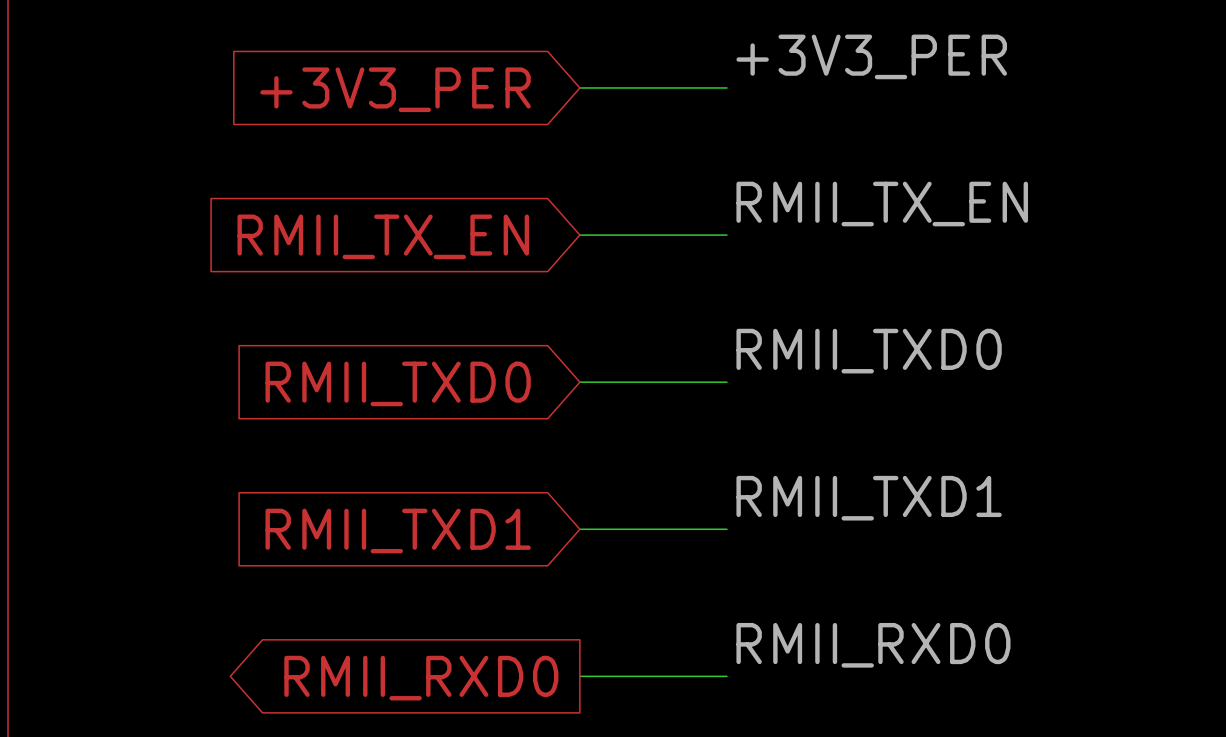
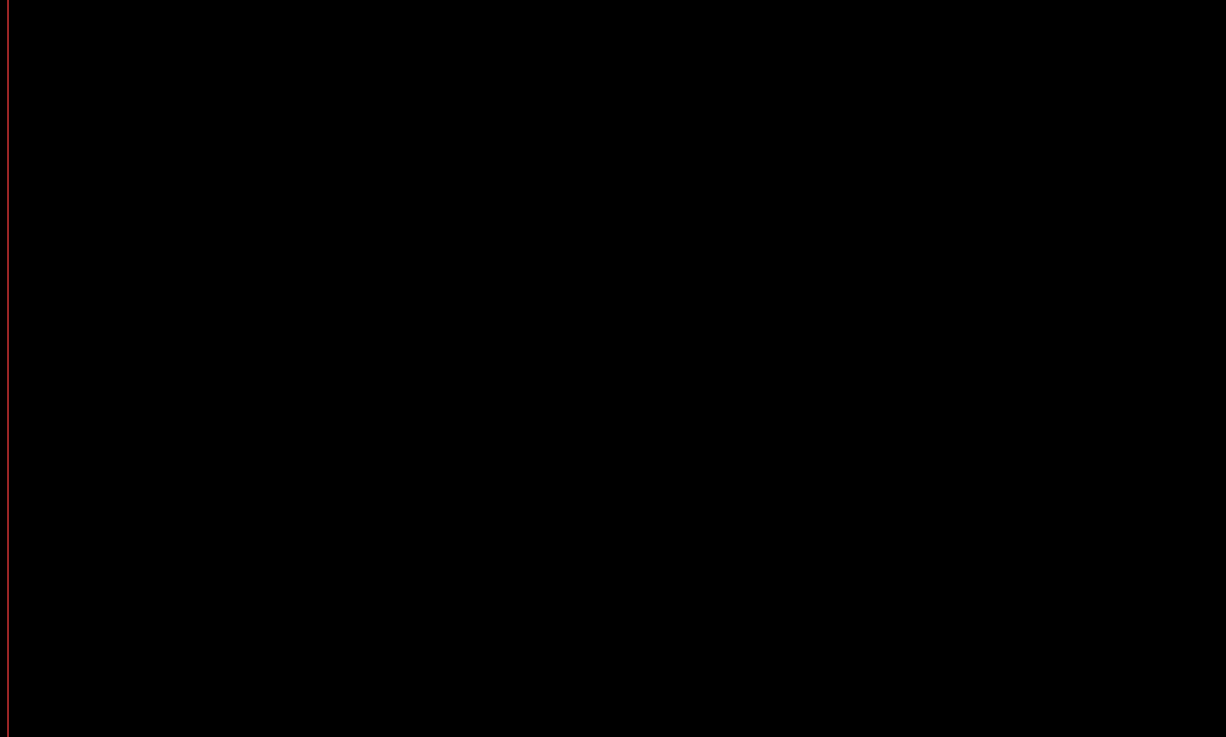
label: +3V3_PER (871, 56) -> none
wire: (579, 87) (726, 87) -> none
global label: +3V3_PER (395, 89) -> none
label: RMII_TX_EN (882, 204) -> none
wire: (579, 235) (726, 235) -> none
global label: RMII_TX_EN (383, 236) -> none
label: RMII_TXD0 (869, 351) -> none
wire: (579, 382) (726, 382) -> none
global label: RMII_TXD0 (398, 383) -> none
label: RMII_TXD1 (869, 498) -> none
wire: (579, 529) (726, 529) -> none
global label: RMII_TXD1 (398, 531) -> none
label: RMII_RXD0 (873, 645) -> none
wire: (579, 676) (726, 676) -> none
global label: RMII_RXD0 (421, 678) -> none

